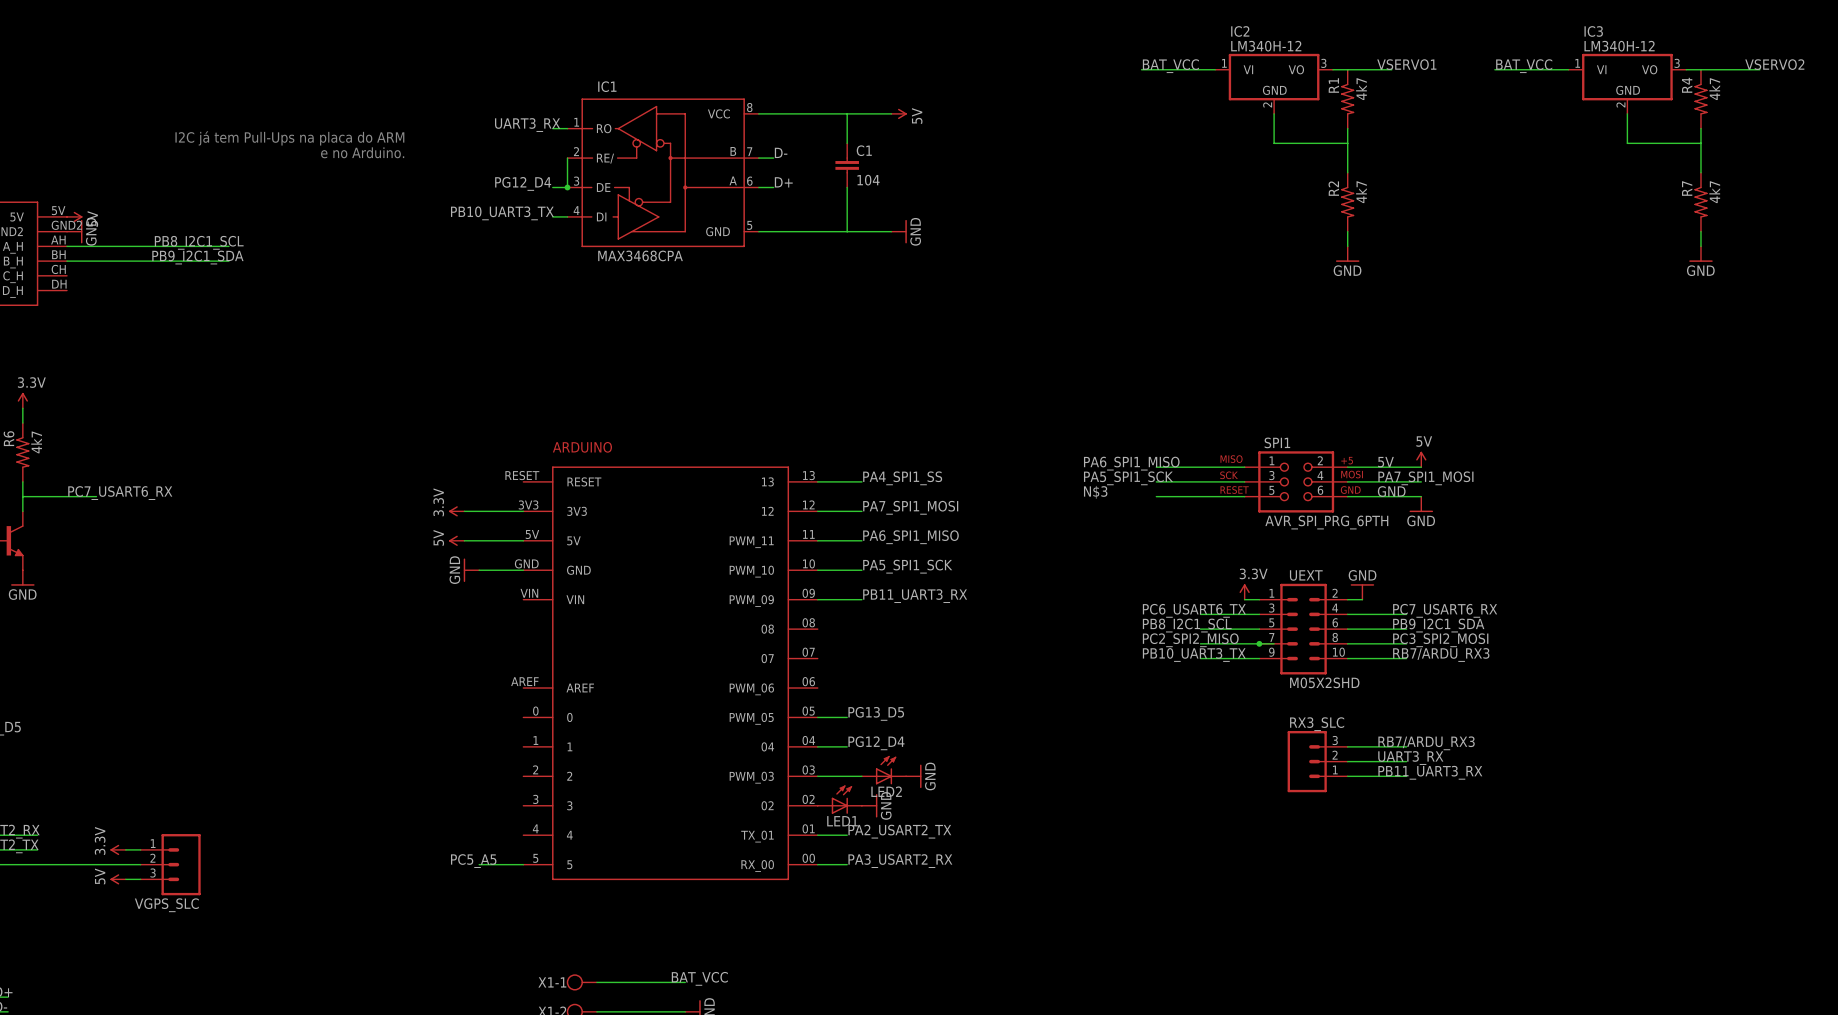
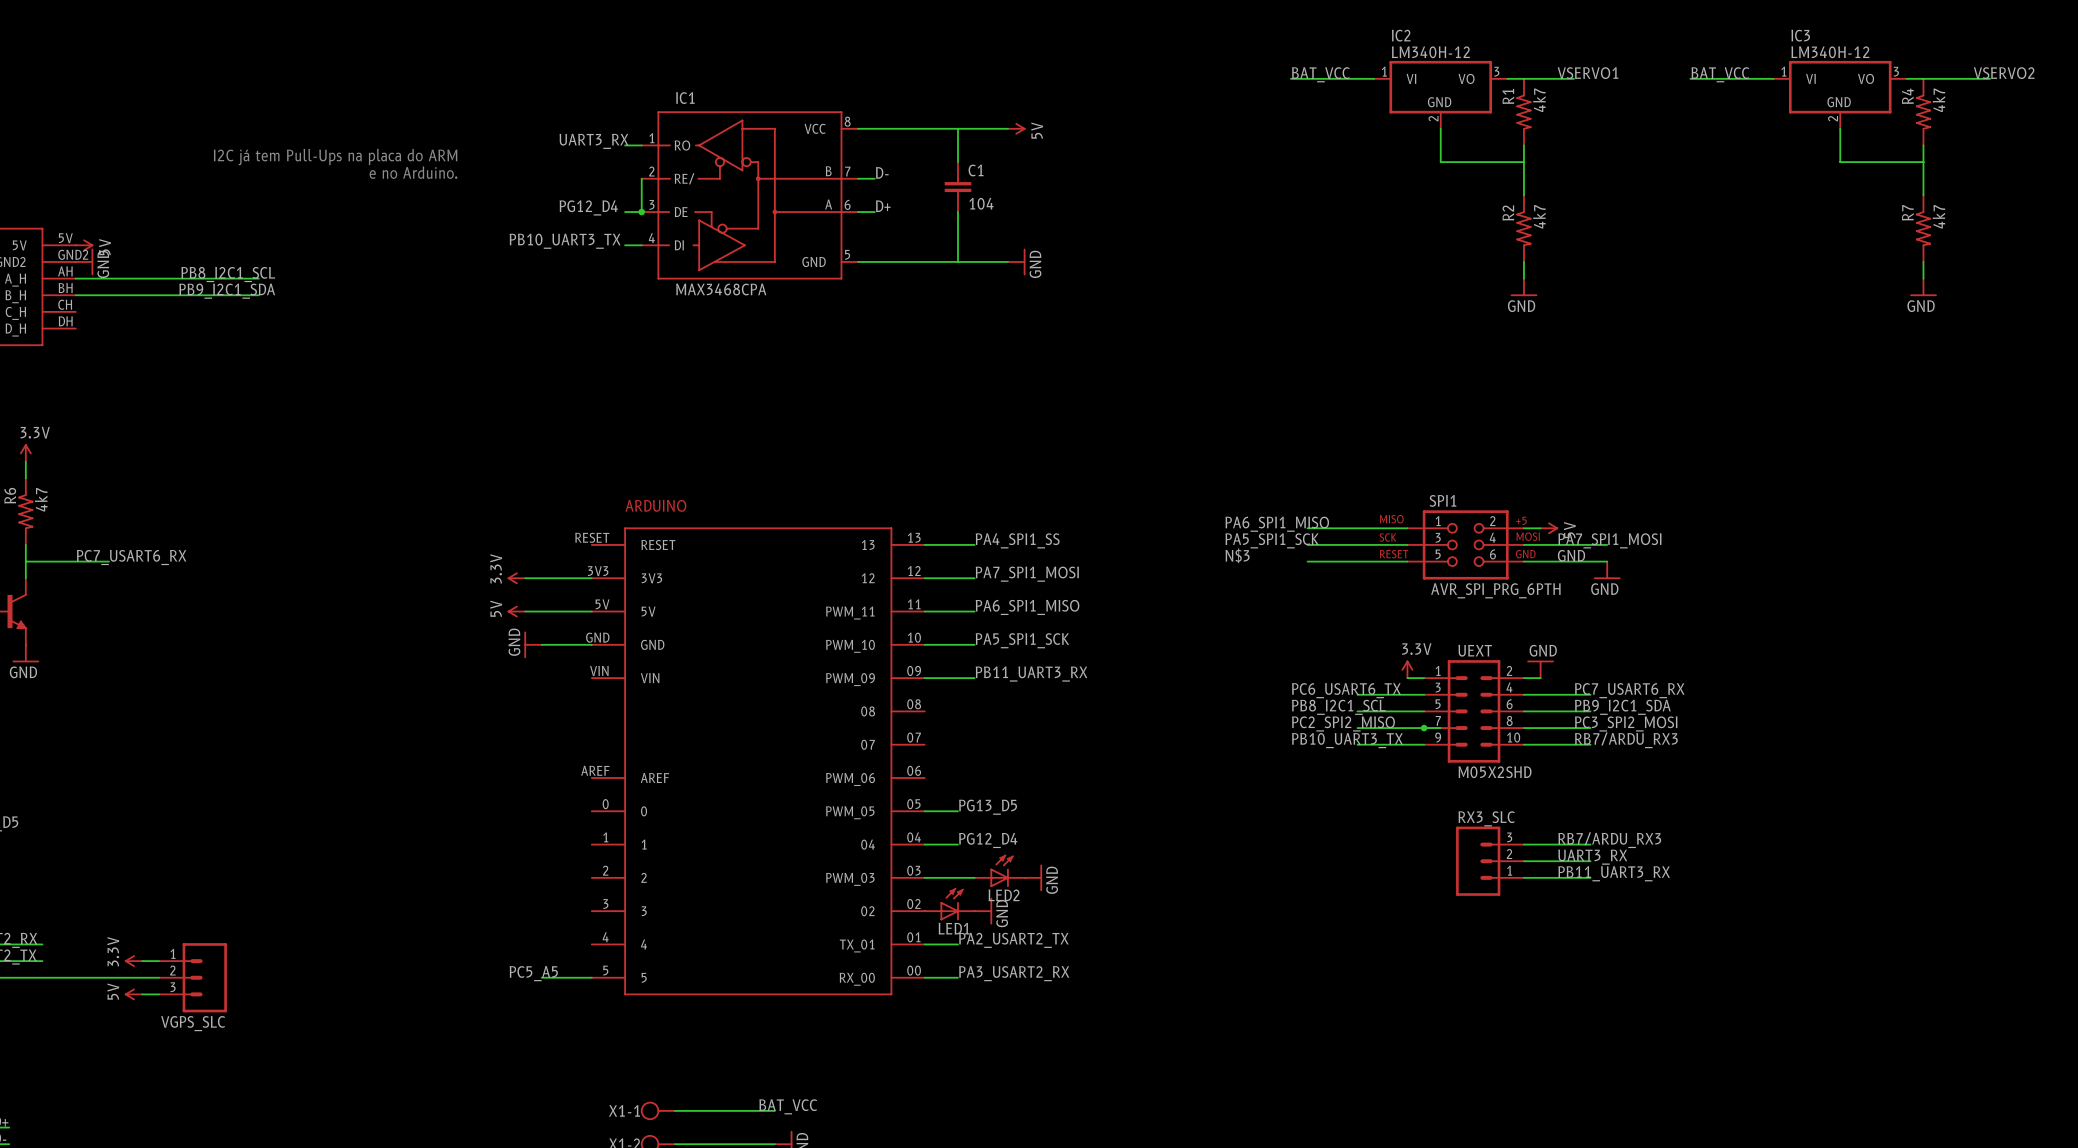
power symbol rotation: 0° (1421, 456) -> 90° clockwise (1553, 528)
power symbol position: 5V (1421, 459) -> 5V (1549, 528)
label: 5V (1385, 462) -> none
wire: (1362, 467) (1421, 467) -> none

